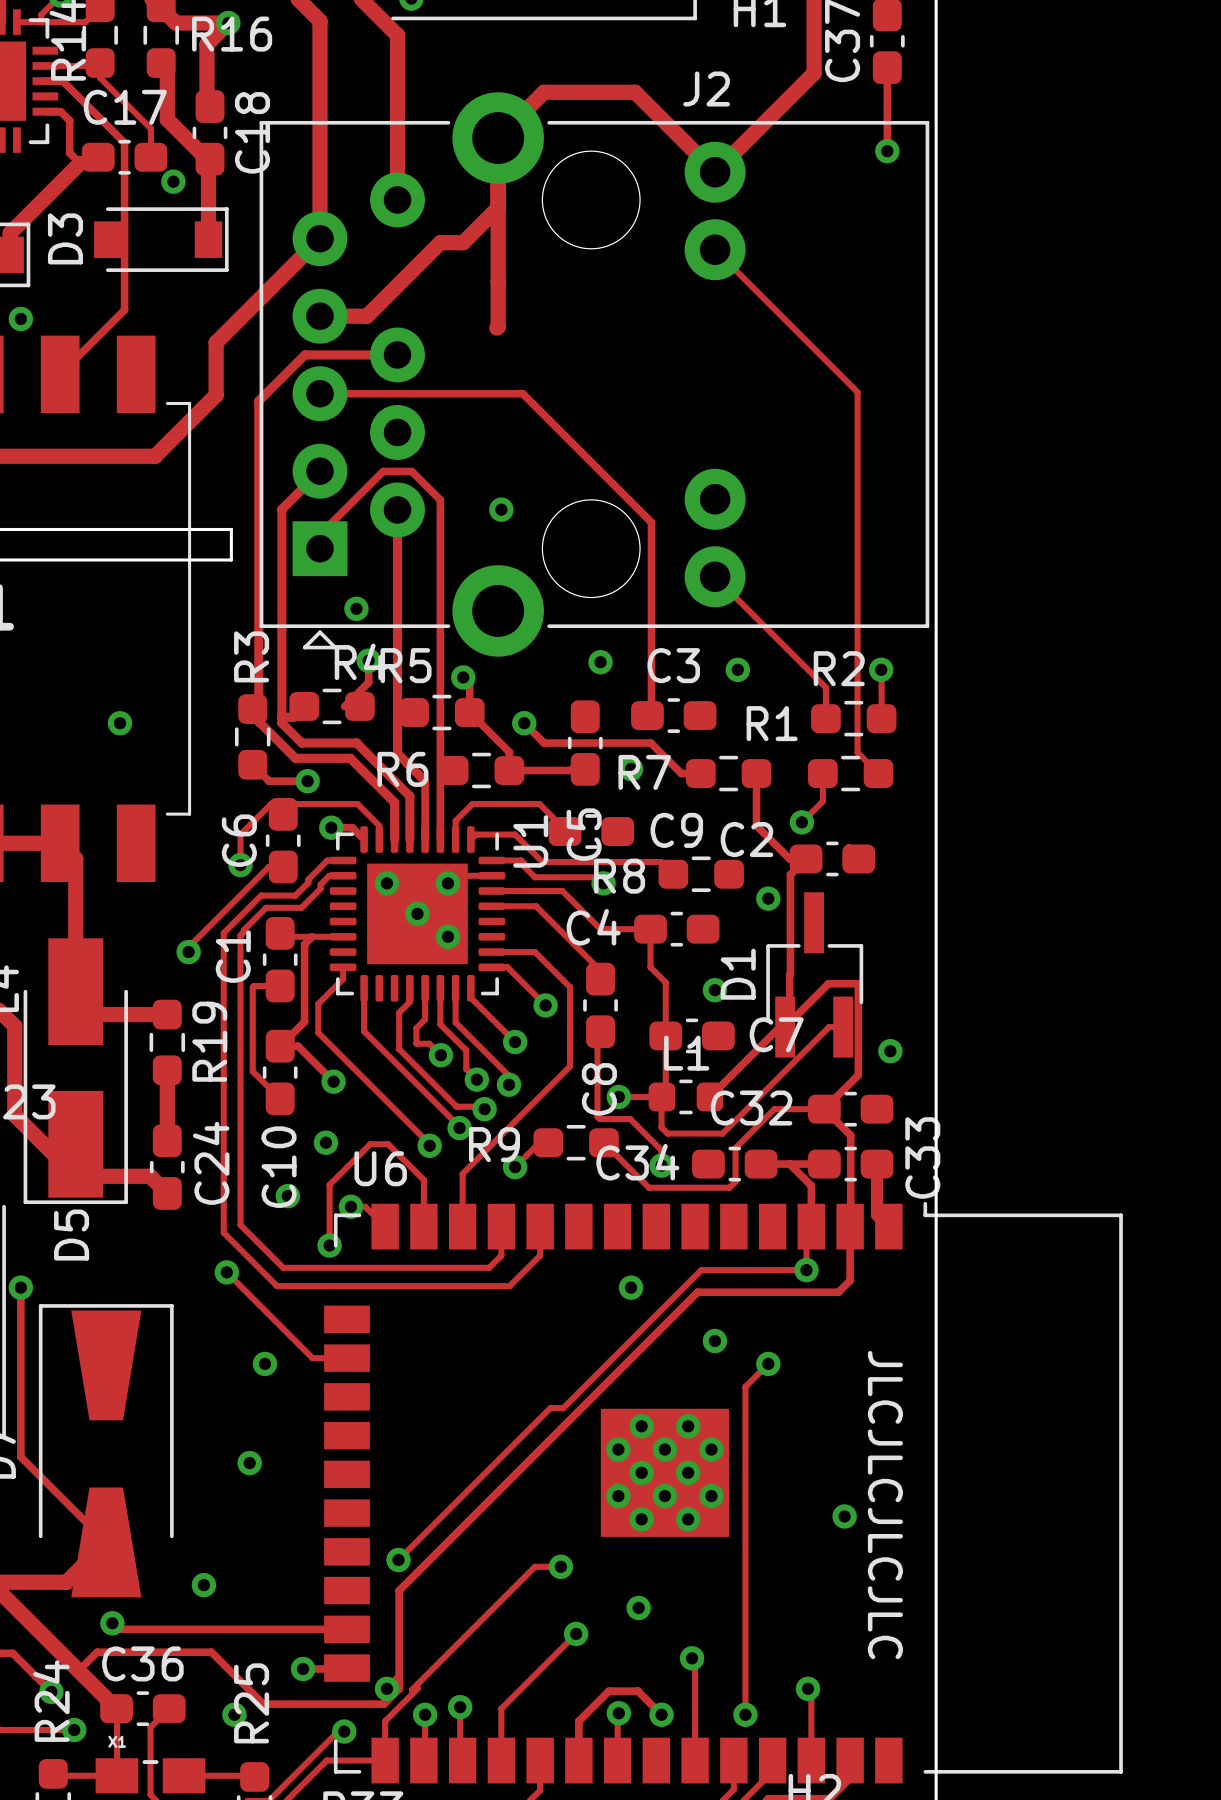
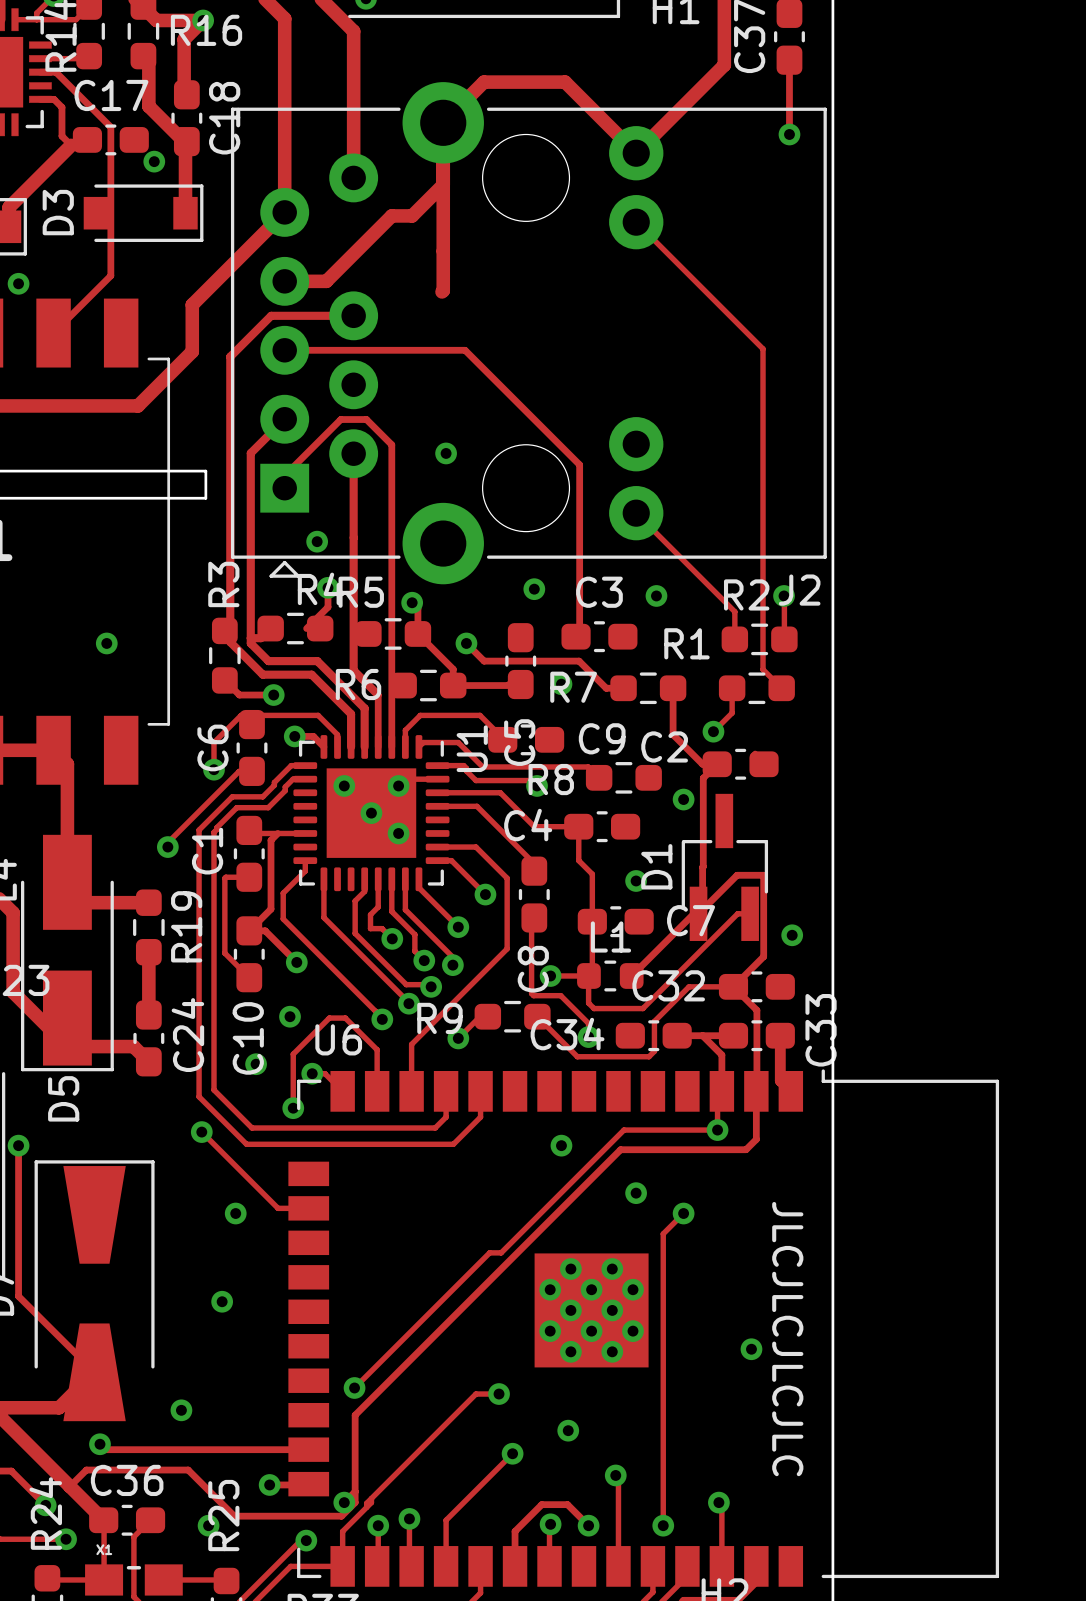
track: (100, 63) (100, 77) (150, 128) (150, 157) -> none
J2 name position: J2 (706, 89) -> J2 (799, 590)

